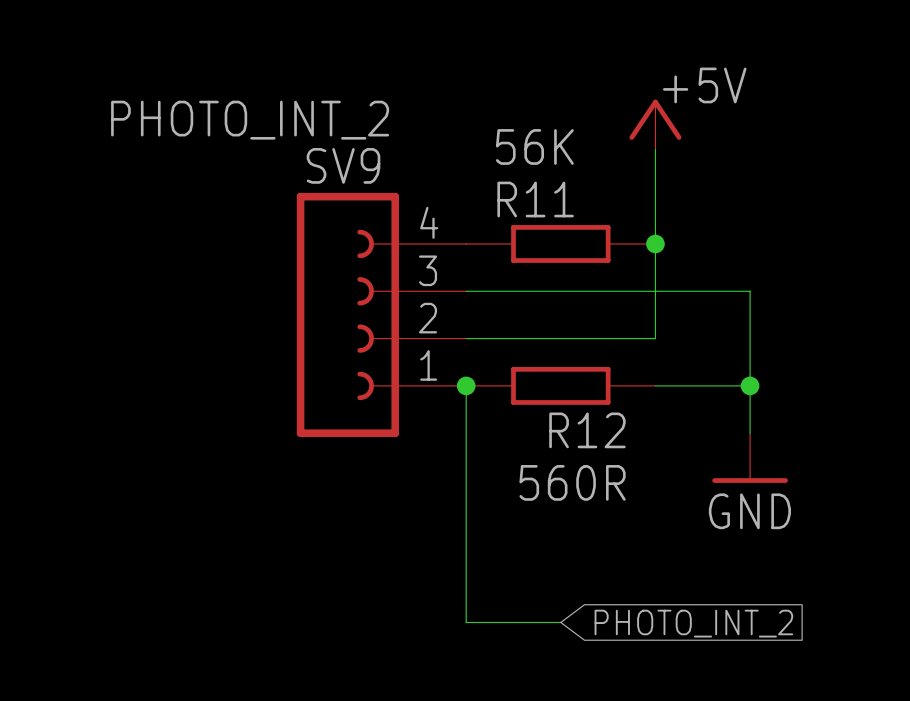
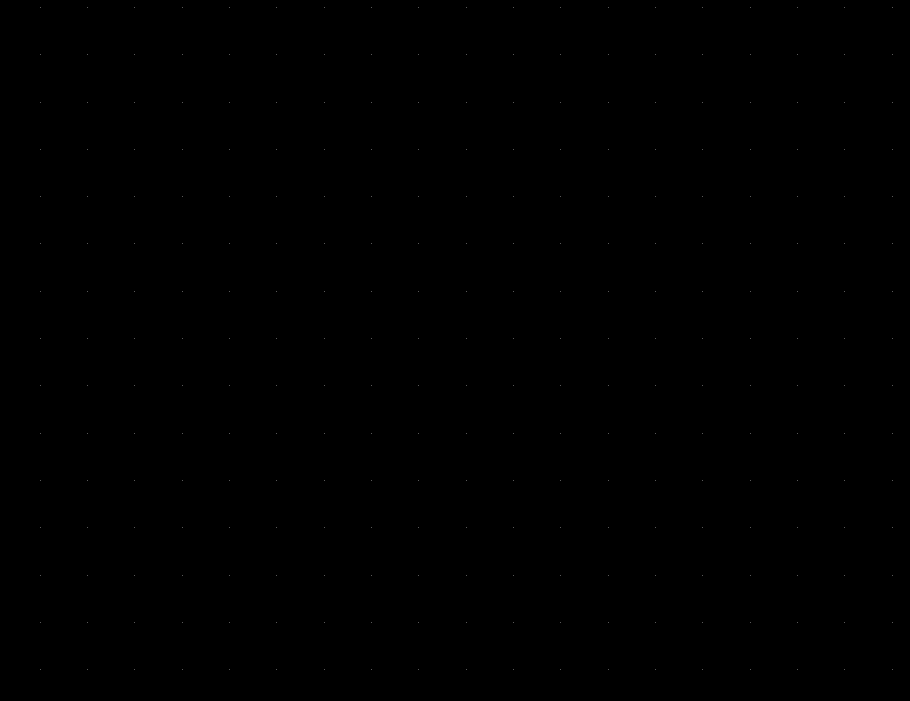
power symbol: +5V (655, 124) -> none
wire: (655, 149) (655, 338) (466, 338) -> none
R11: 56K (560, 243) -> none
junction: (655, 243) -> none
wire: (466, 291) (750, 291) (750, 433) -> none
SV9: PHOTO_INT_2 (381, 314) -> none
wire: (466, 385) (466, 622) (560, 622) -> none
junction: (466, 385) -> none
R12: 560R (560, 385) -> none
wire: (655, 385) (750, 385) -> none
junction: (750, 385) -> none
power symbol: GND (750, 458) -> none
global label: PHOTO_INT_2 (693, 623) -> none

